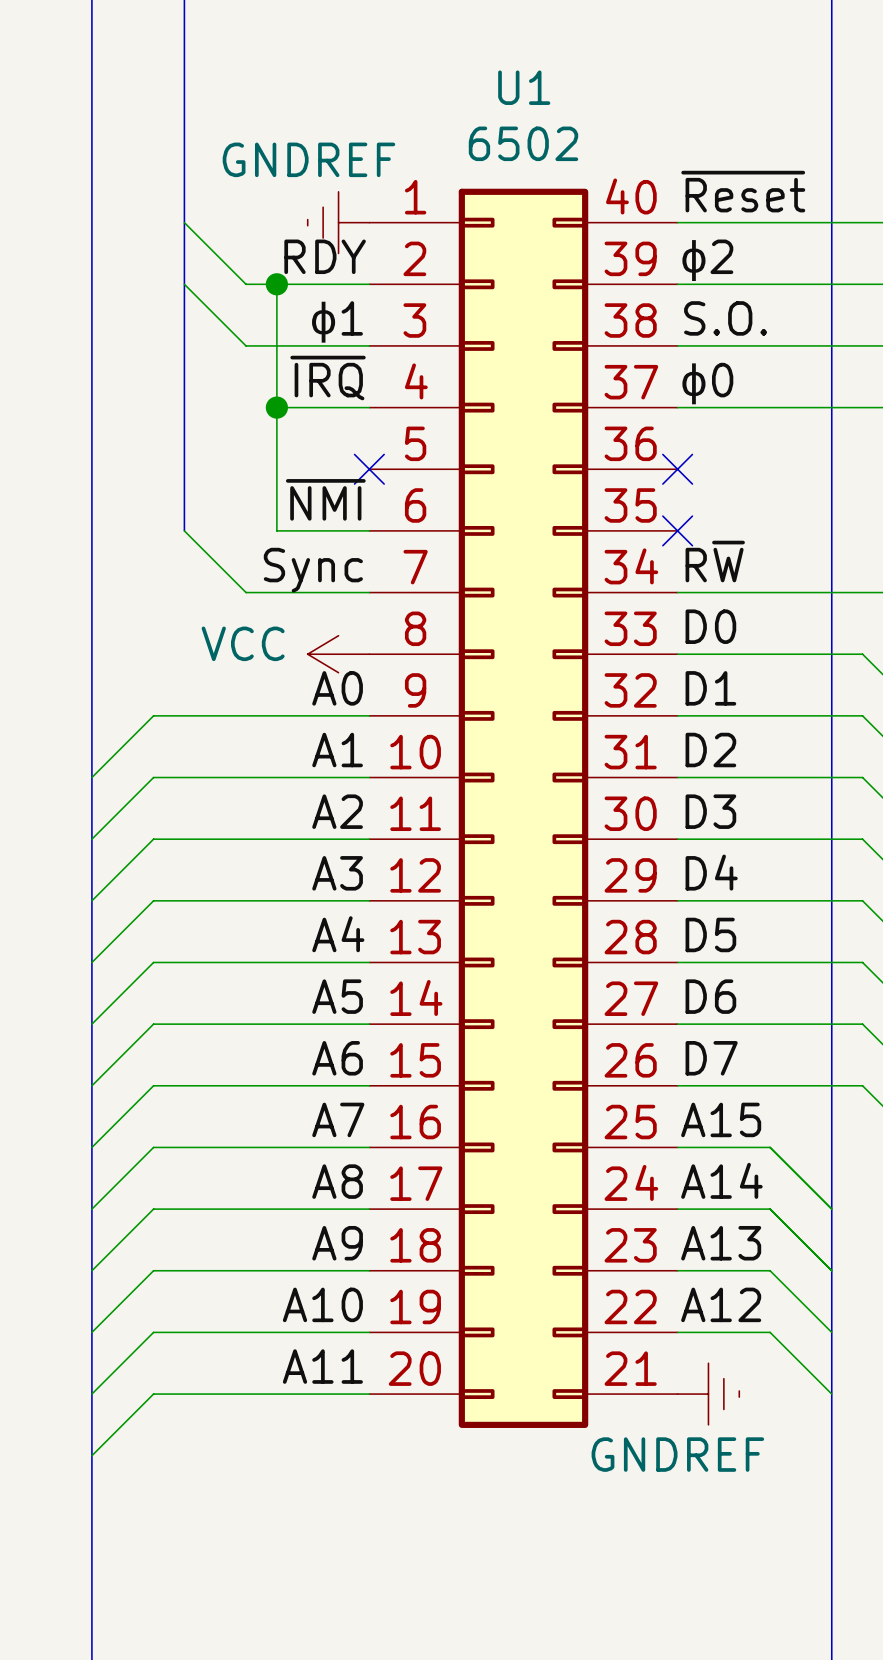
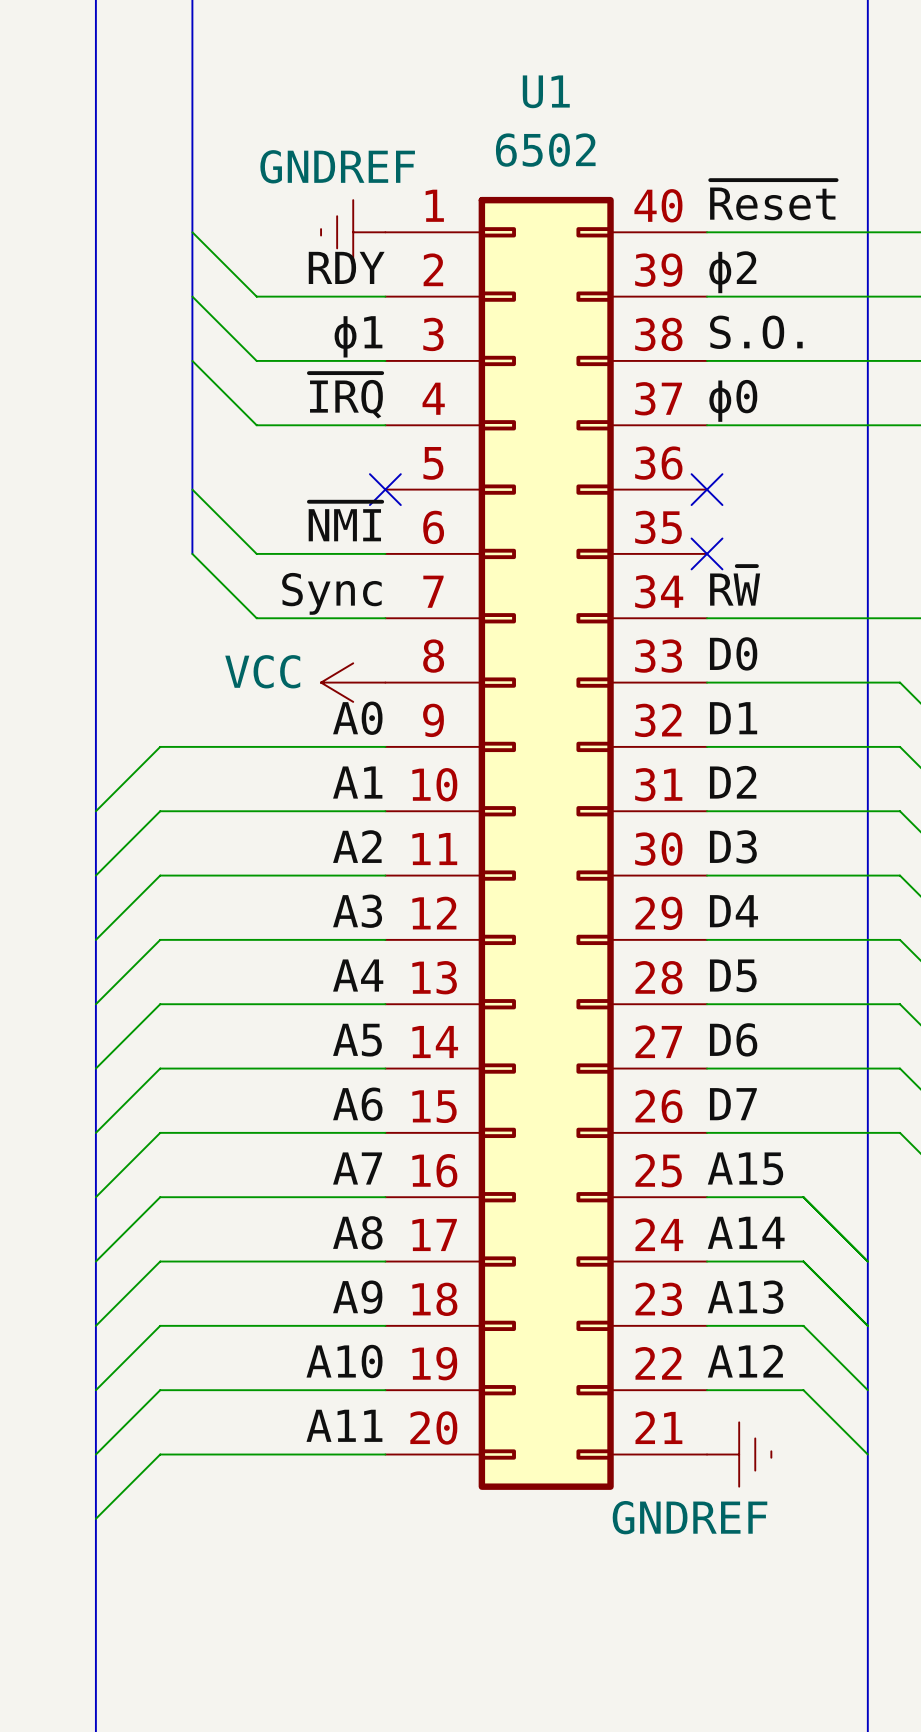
wire: (276, 284) (276, 530) -> (192, 489) (256, 553) (288, 553)
junction: (276, 284) -> none
wire: none -> (192, 360) (256, 425) (288, 425)
junction: (276, 407) -> none

